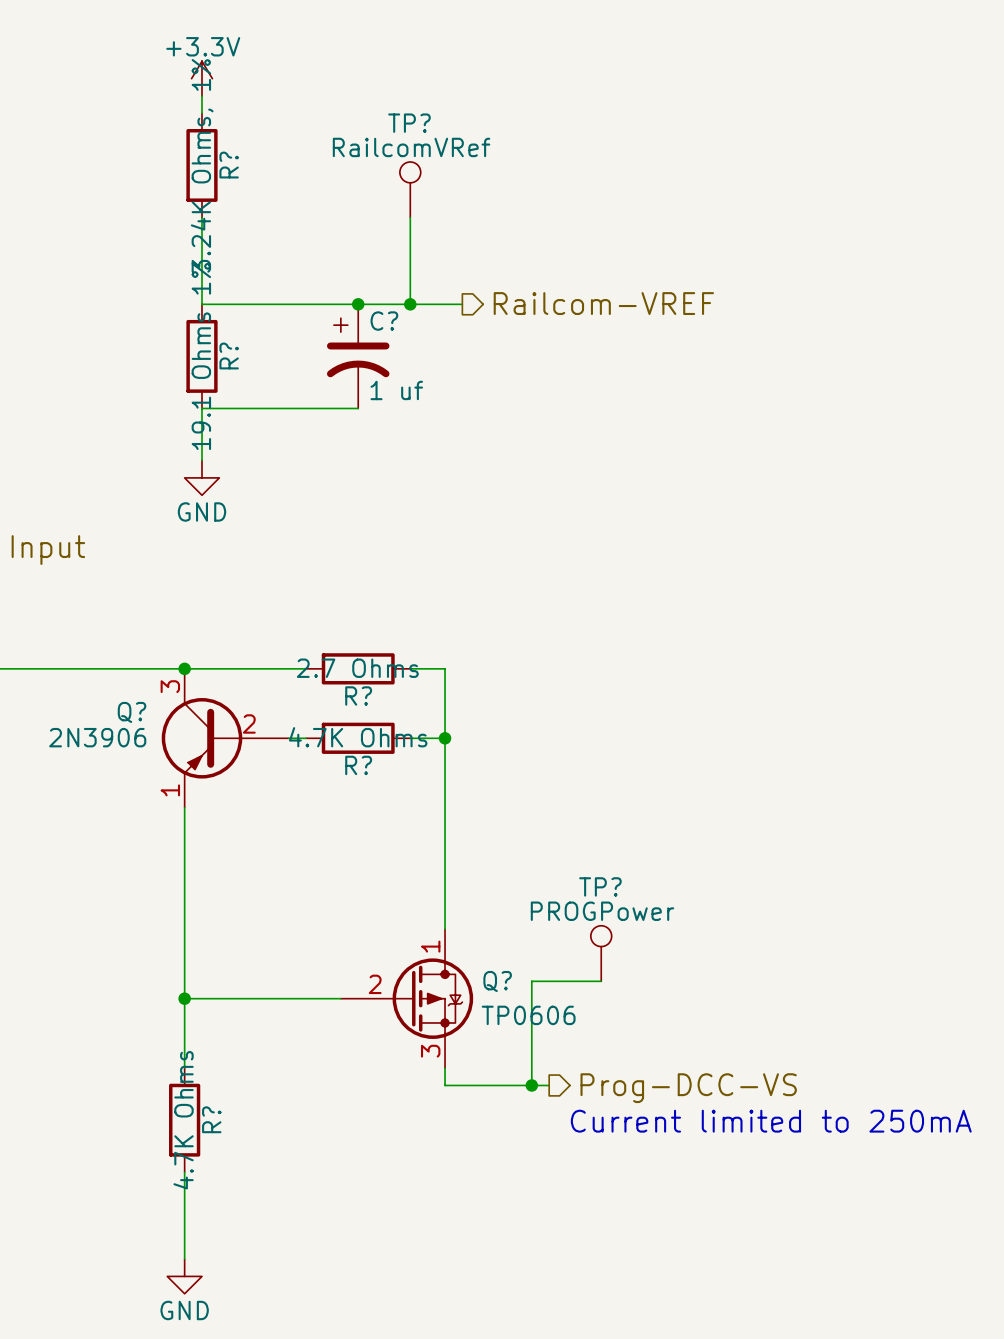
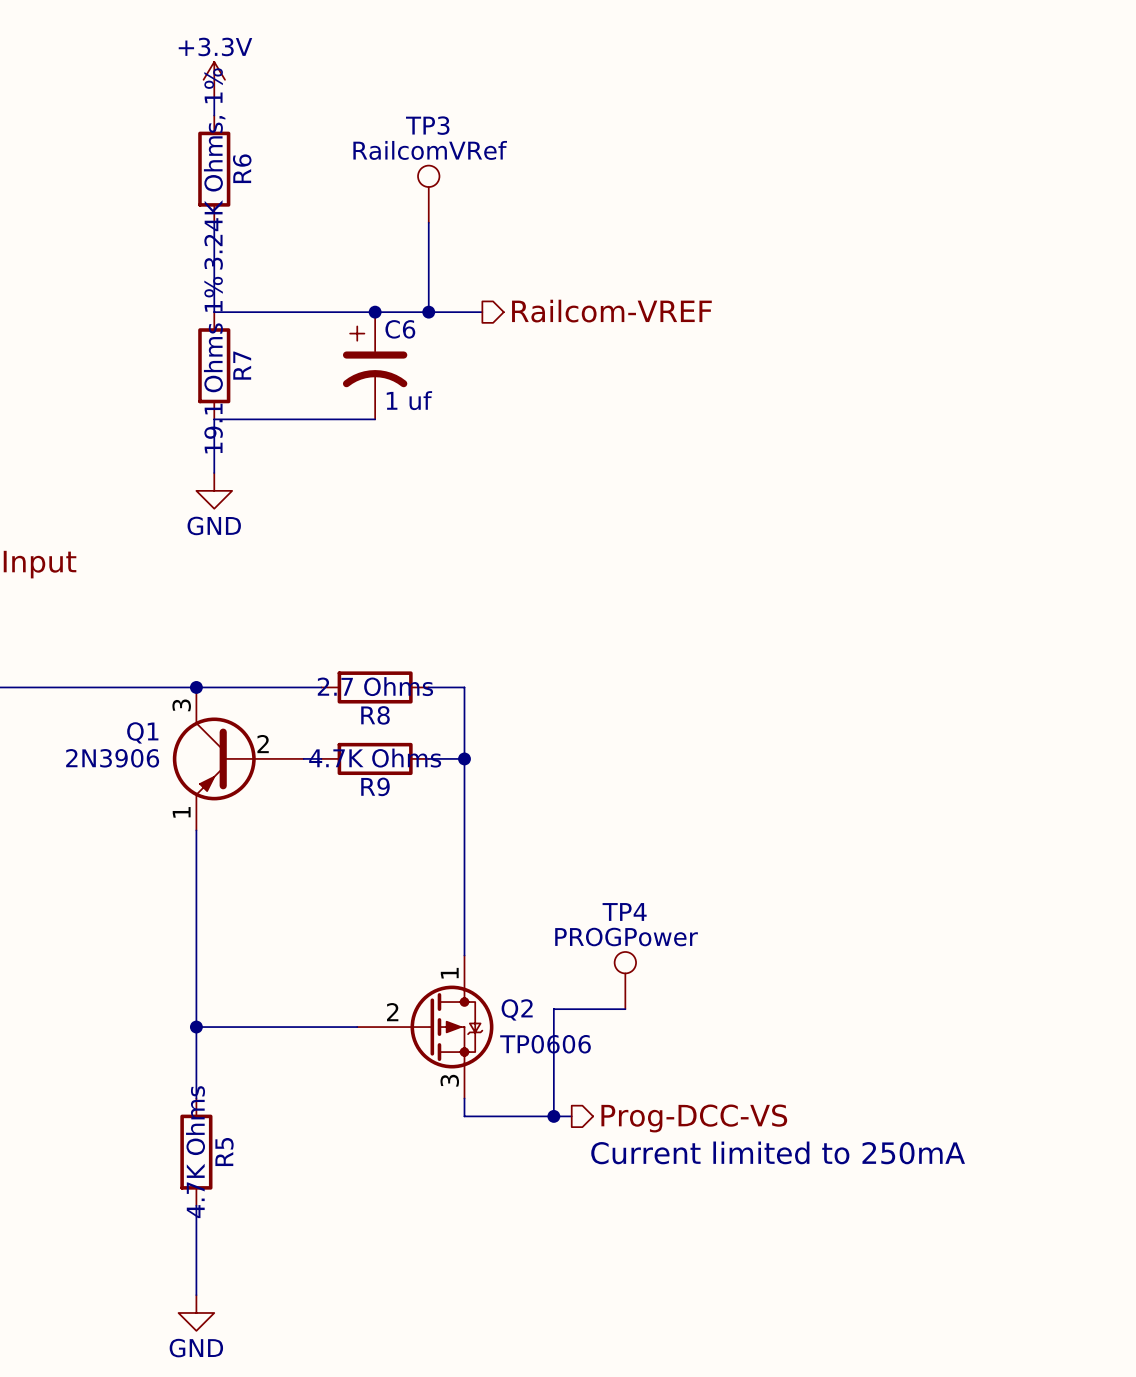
TP? name: TP? (409, 123) -> TP3 (427, 125)
R? name: R? (229, 165) -> R6 (242, 168)
C? name: C? (384, 321) -> C6 (400, 329)
R? name: R? (229, 355) -> R7 (242, 365)
R? name: R? (358, 695) -> R8 (375, 715)
Q? name: Q? (132, 712) -> Q1 (142, 732)
R? name: R? (358, 765) -> R9 (375, 786)
TP? name: TP? (600, 886) -> TP4 (624, 911)
Q? name: Q? (497, 981) -> Q2 (517, 1009)
R? name: R? (211, 1119) -> R5 (224, 1152)

